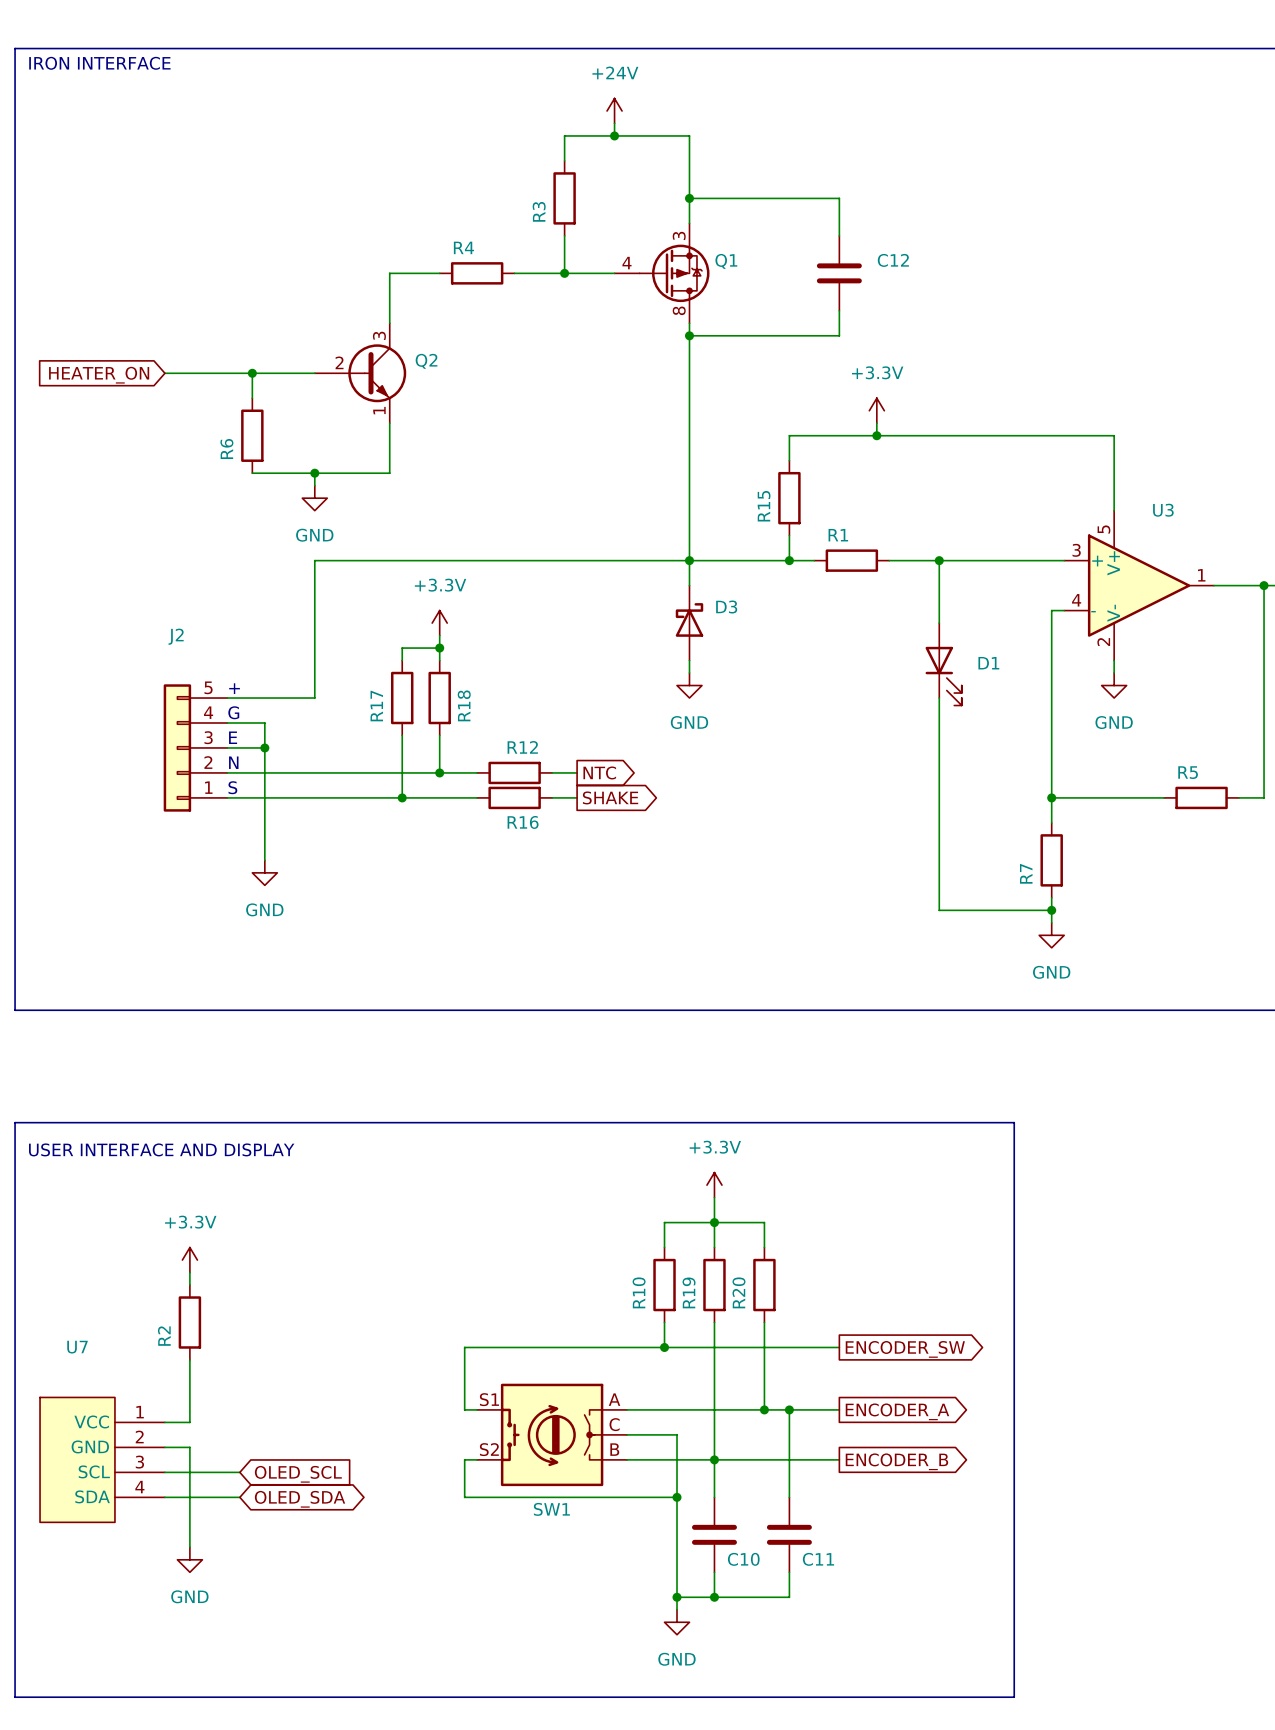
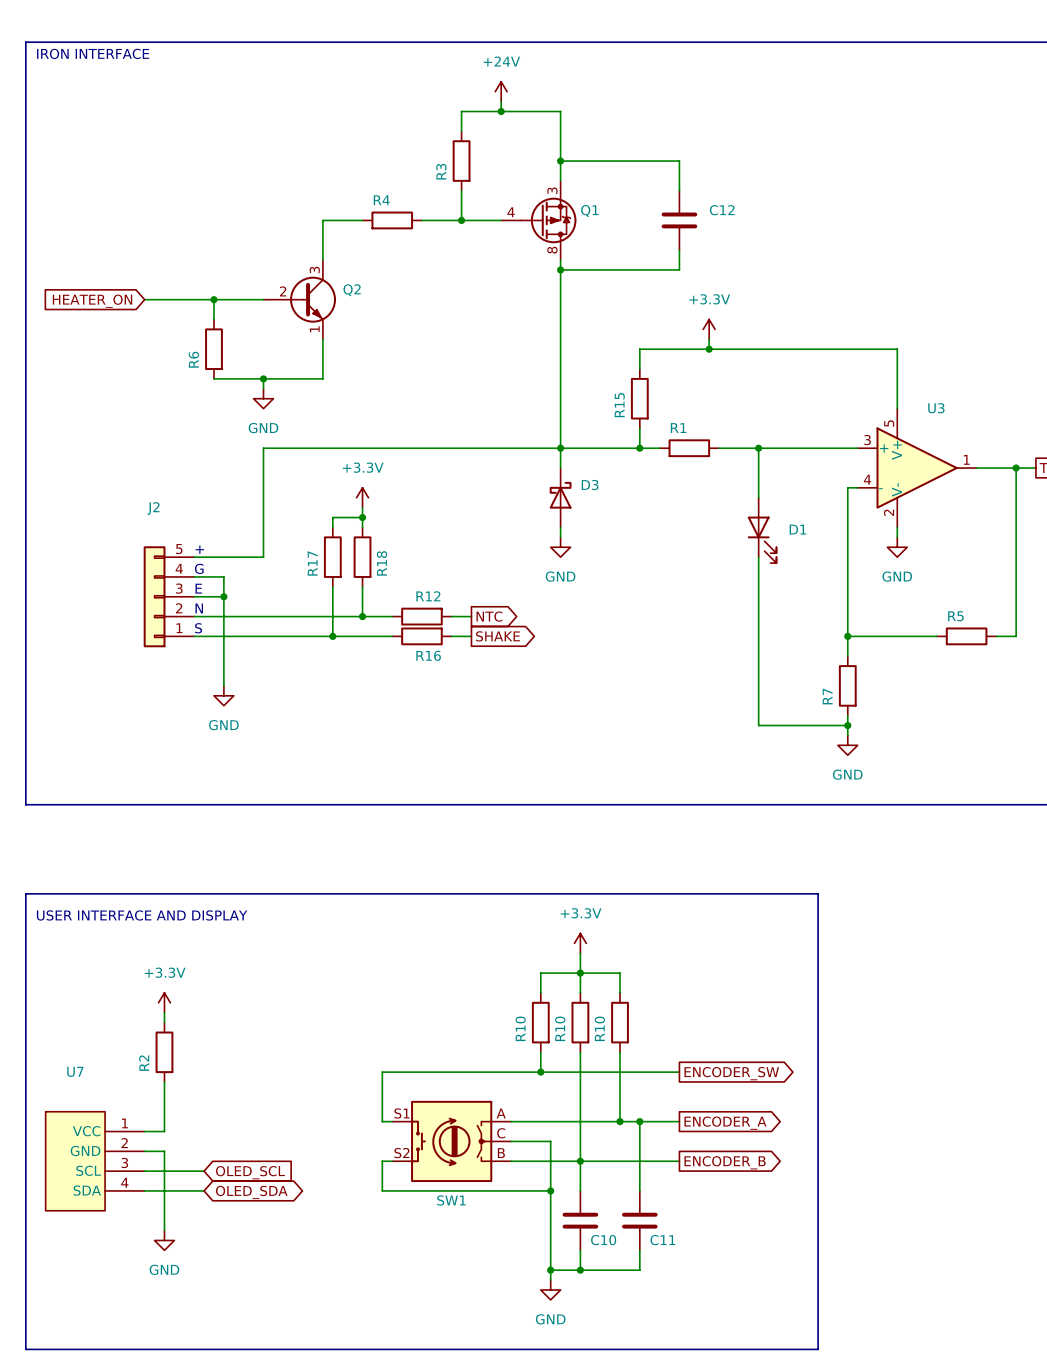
R19 name: R19 (689, 1292) -> R10 (560, 1028)
R20 name: R20 (738, 1292) -> R10 (599, 1028)

